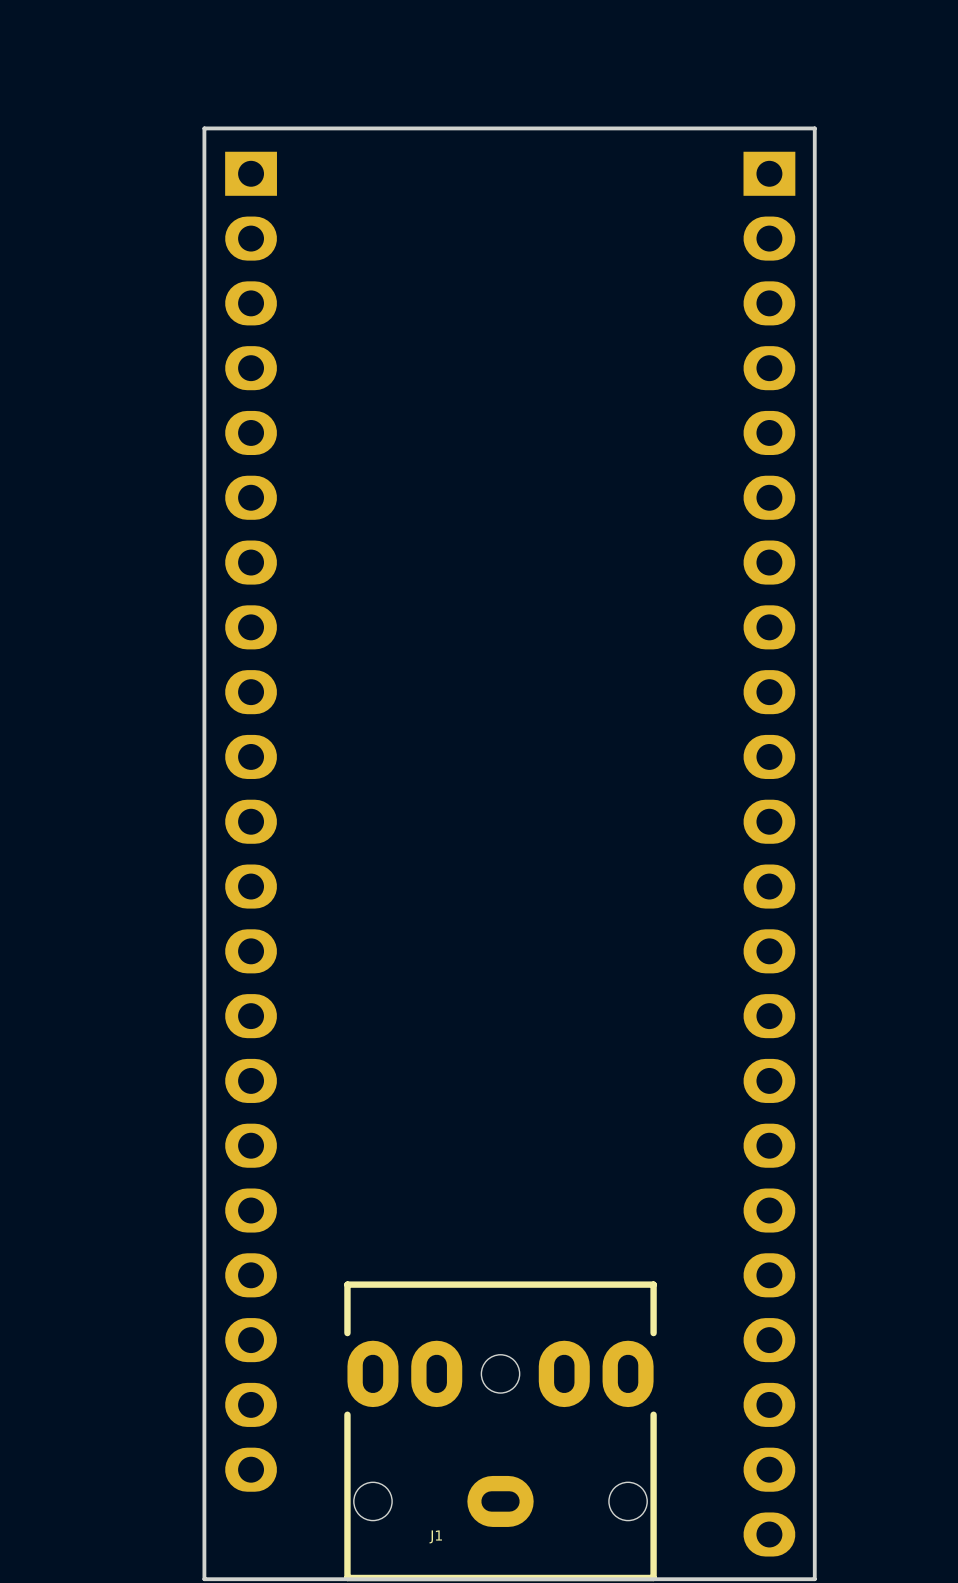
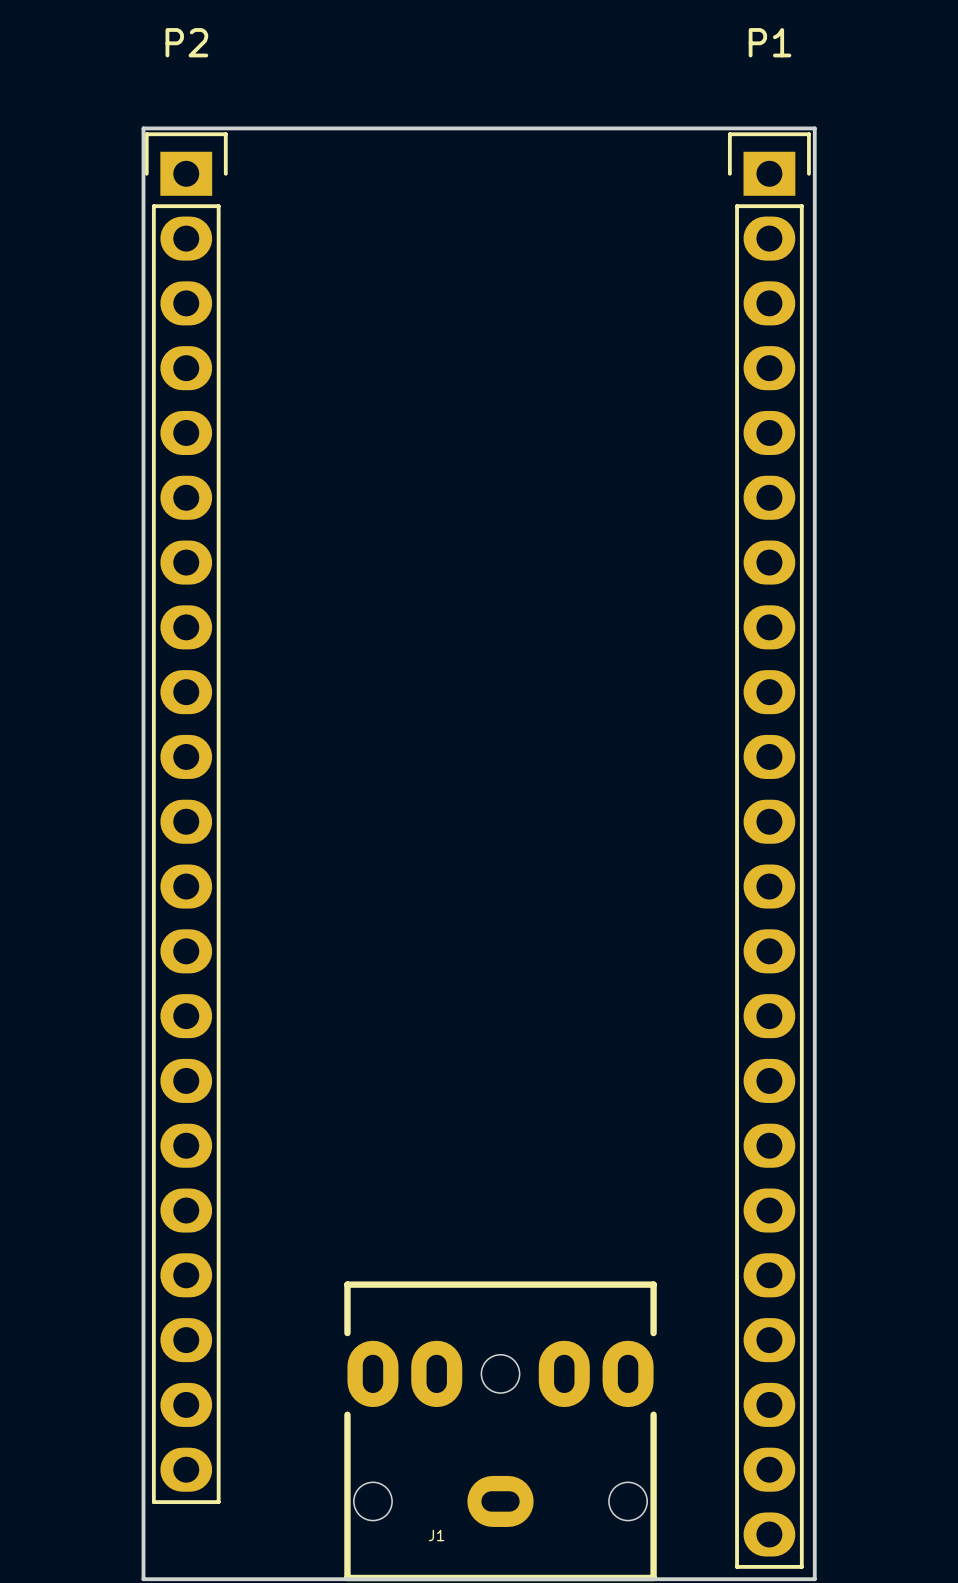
board edge: (204, 128) (204, 1579) -> (204, 128) (143, 128) (143, 1579) (204, 1579)
P2 side: top (251, 821) -> bottom (186, 818)
P1 side: top (769, 854) -> bottom (769, 850)

